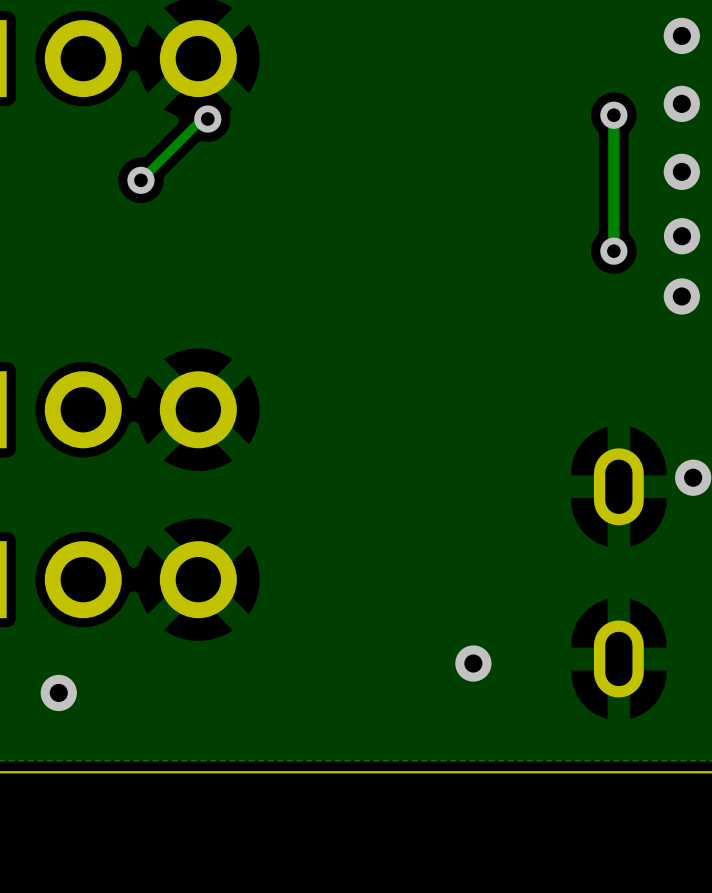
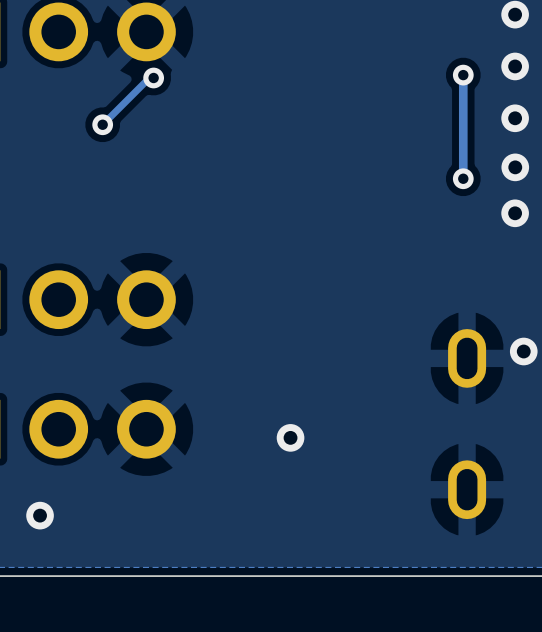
via position: (473, 663) -> (290, 437)

